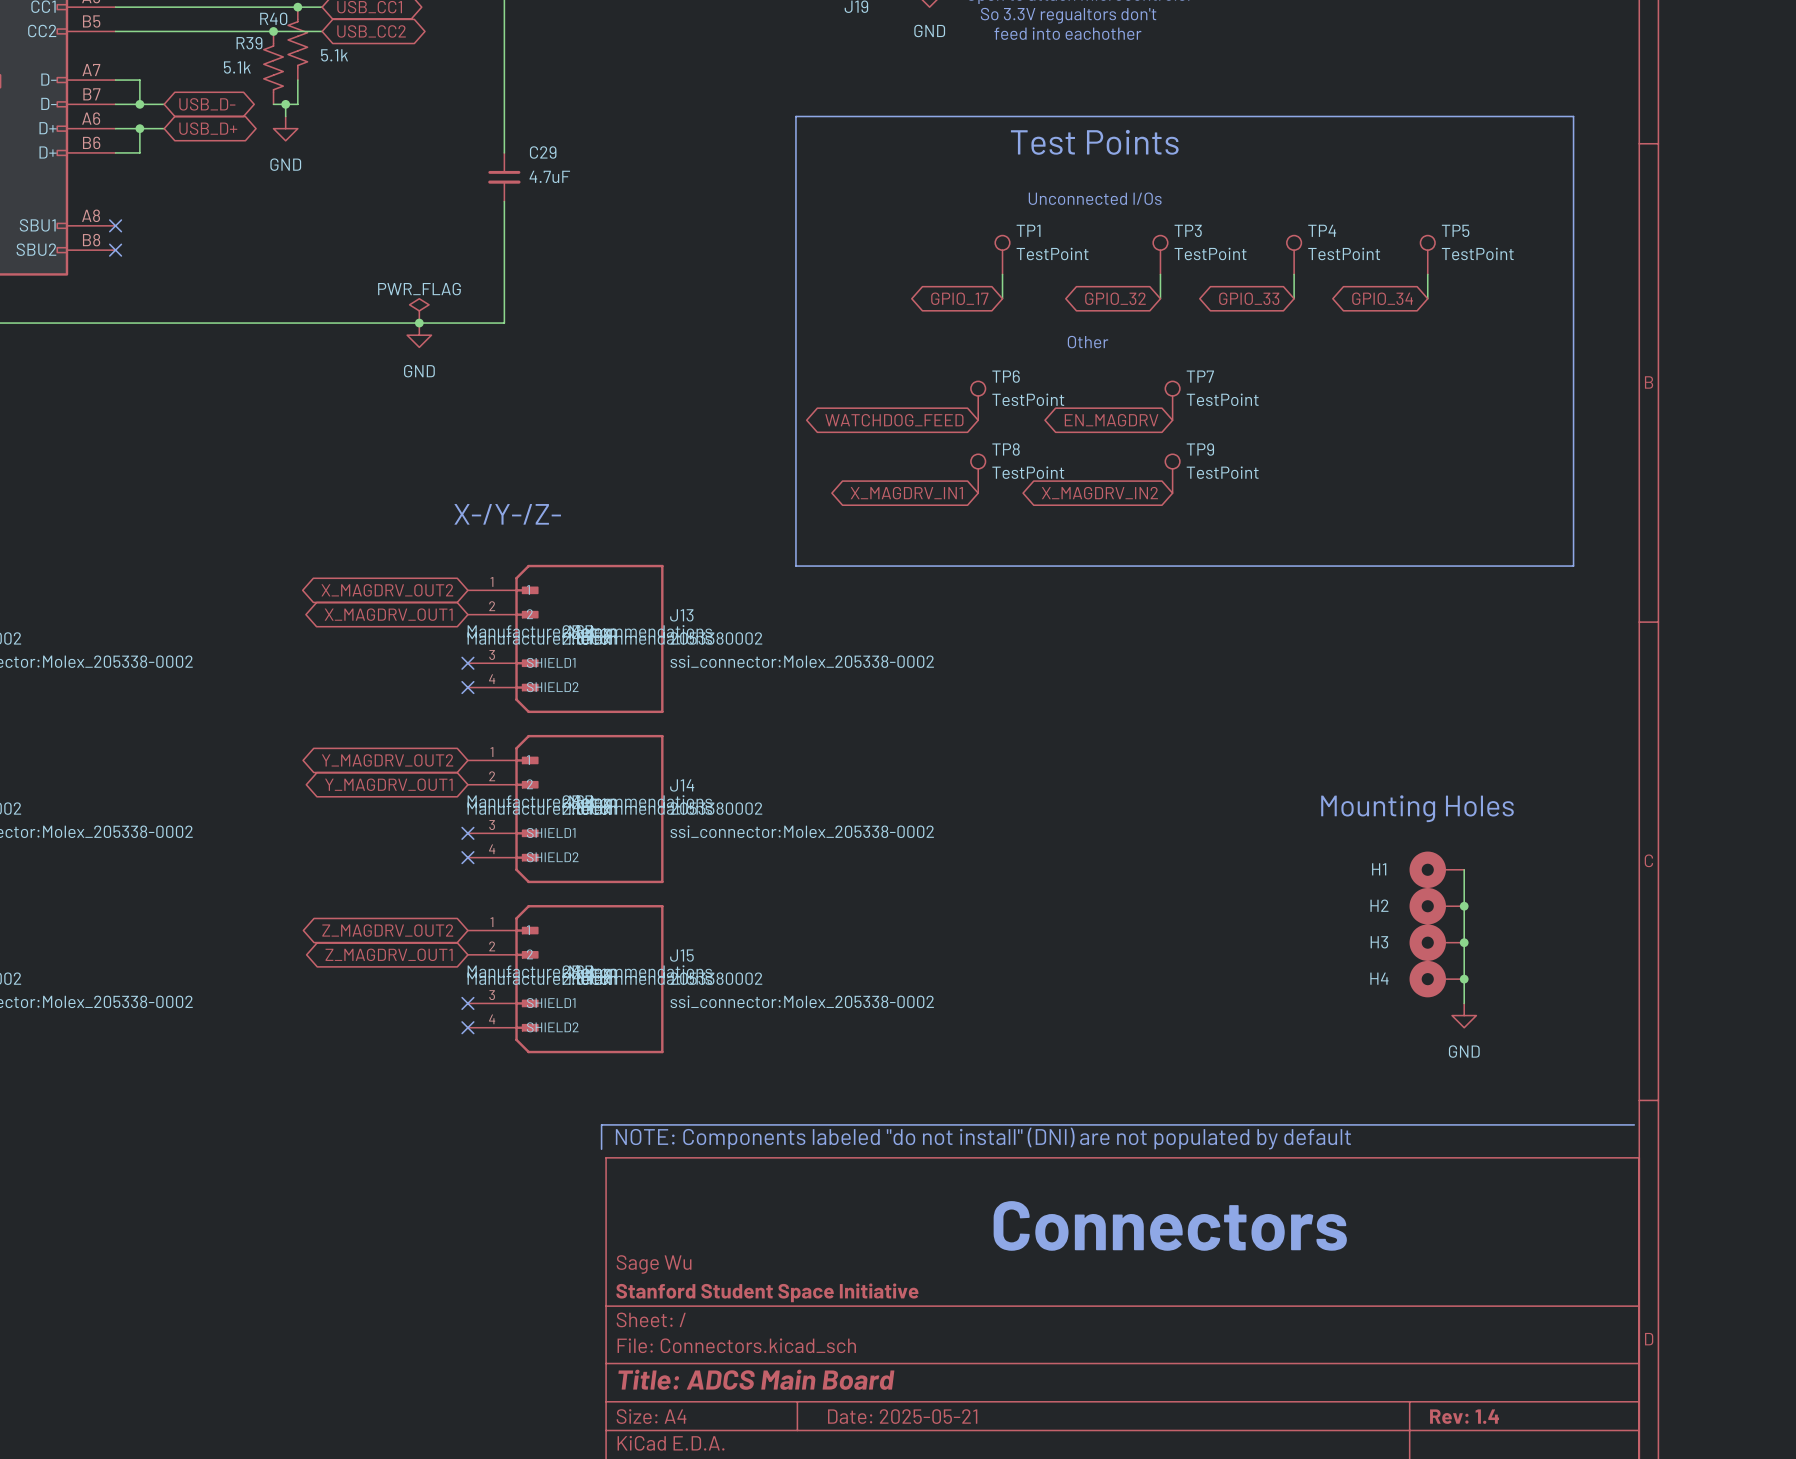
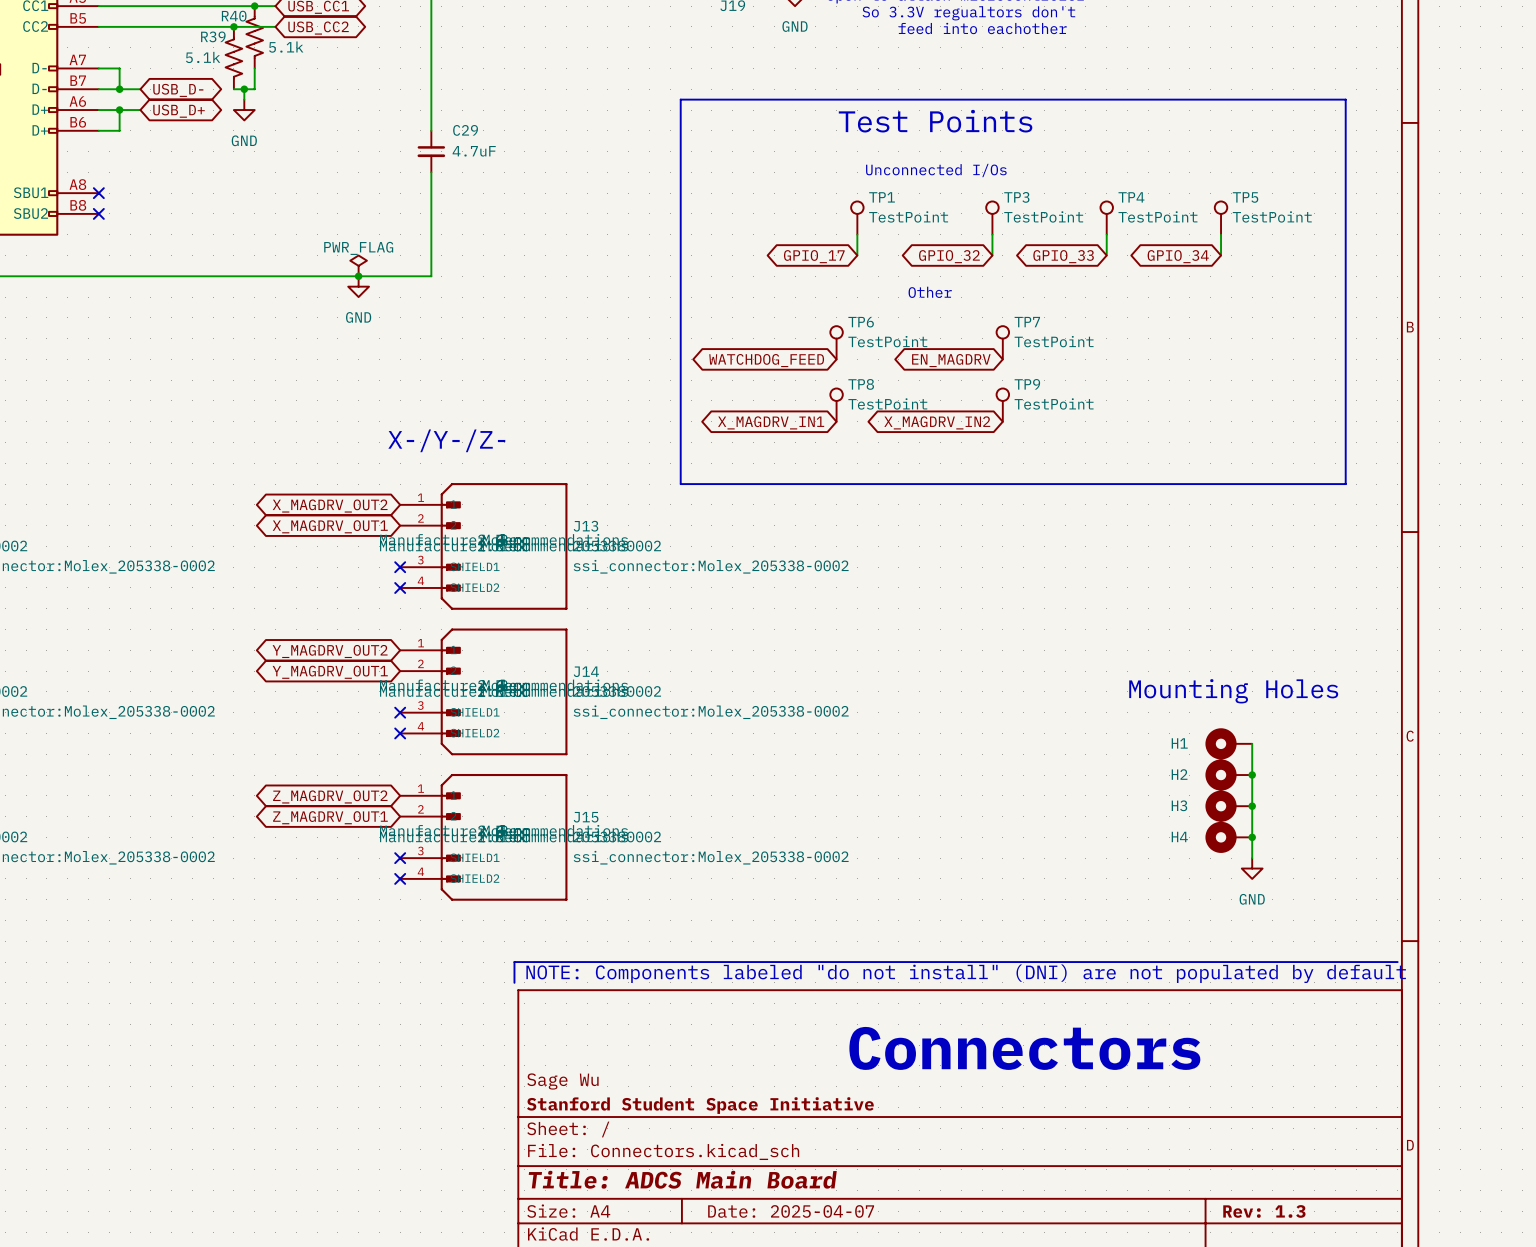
title block: Date: 2025-05-21 (902, 1416) -> Date: 2025-04-07 (791, 1211)
title block: Rev: 1.4 (1464, 1416) -> Rev: 1.3 (1264, 1211)

